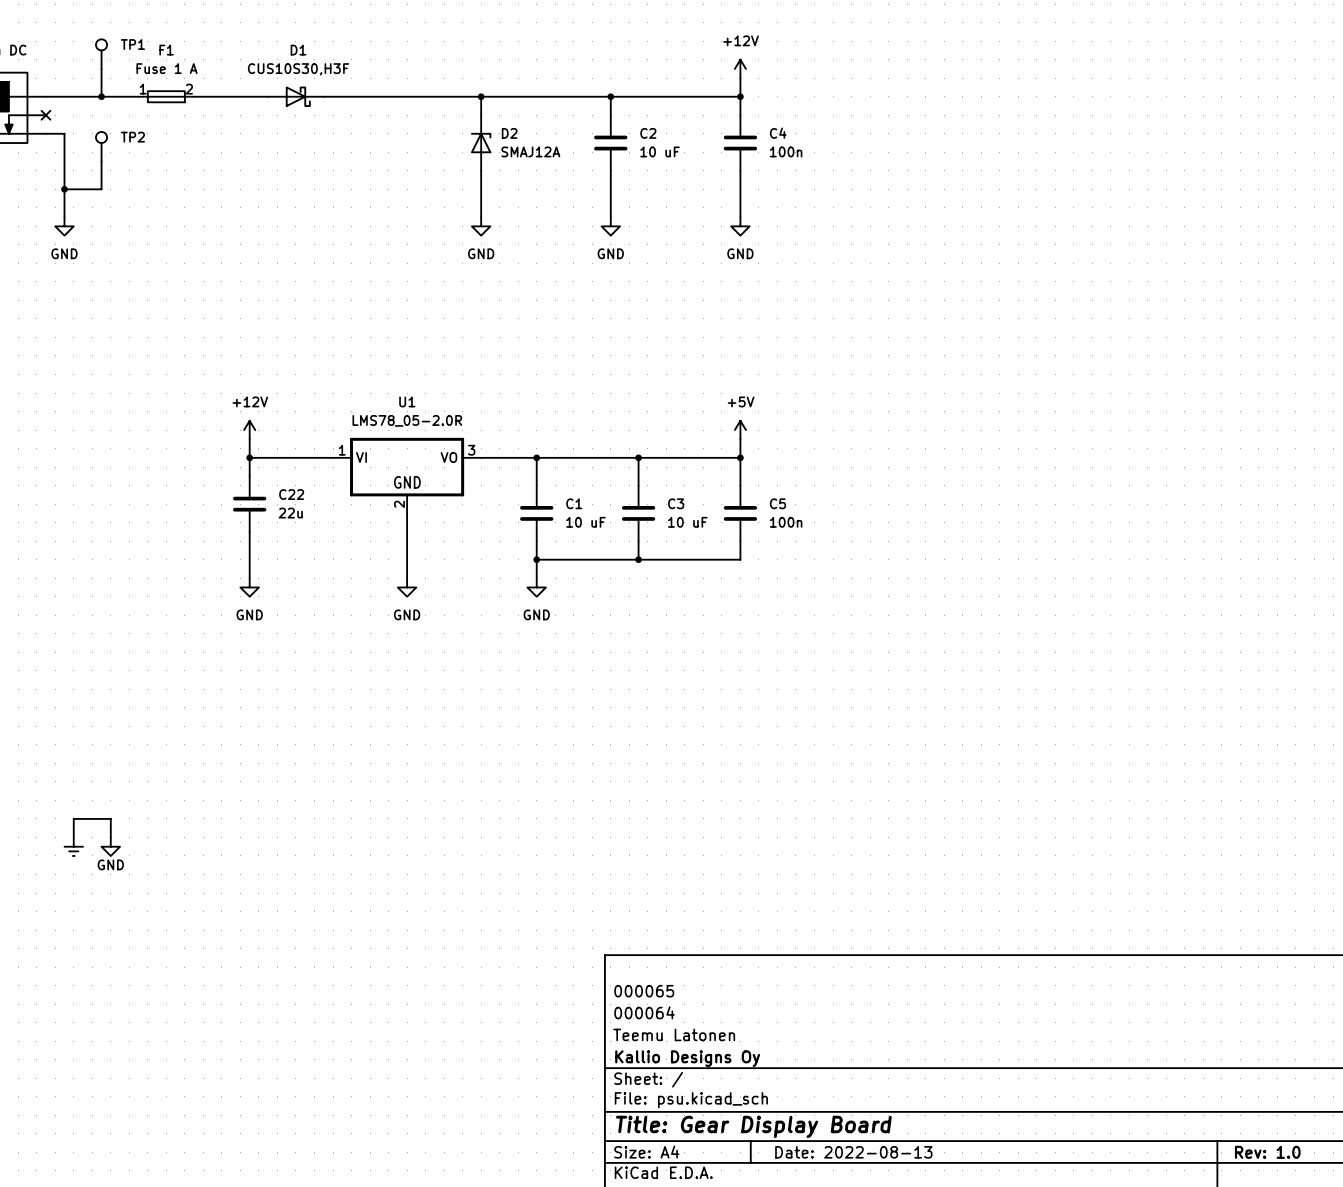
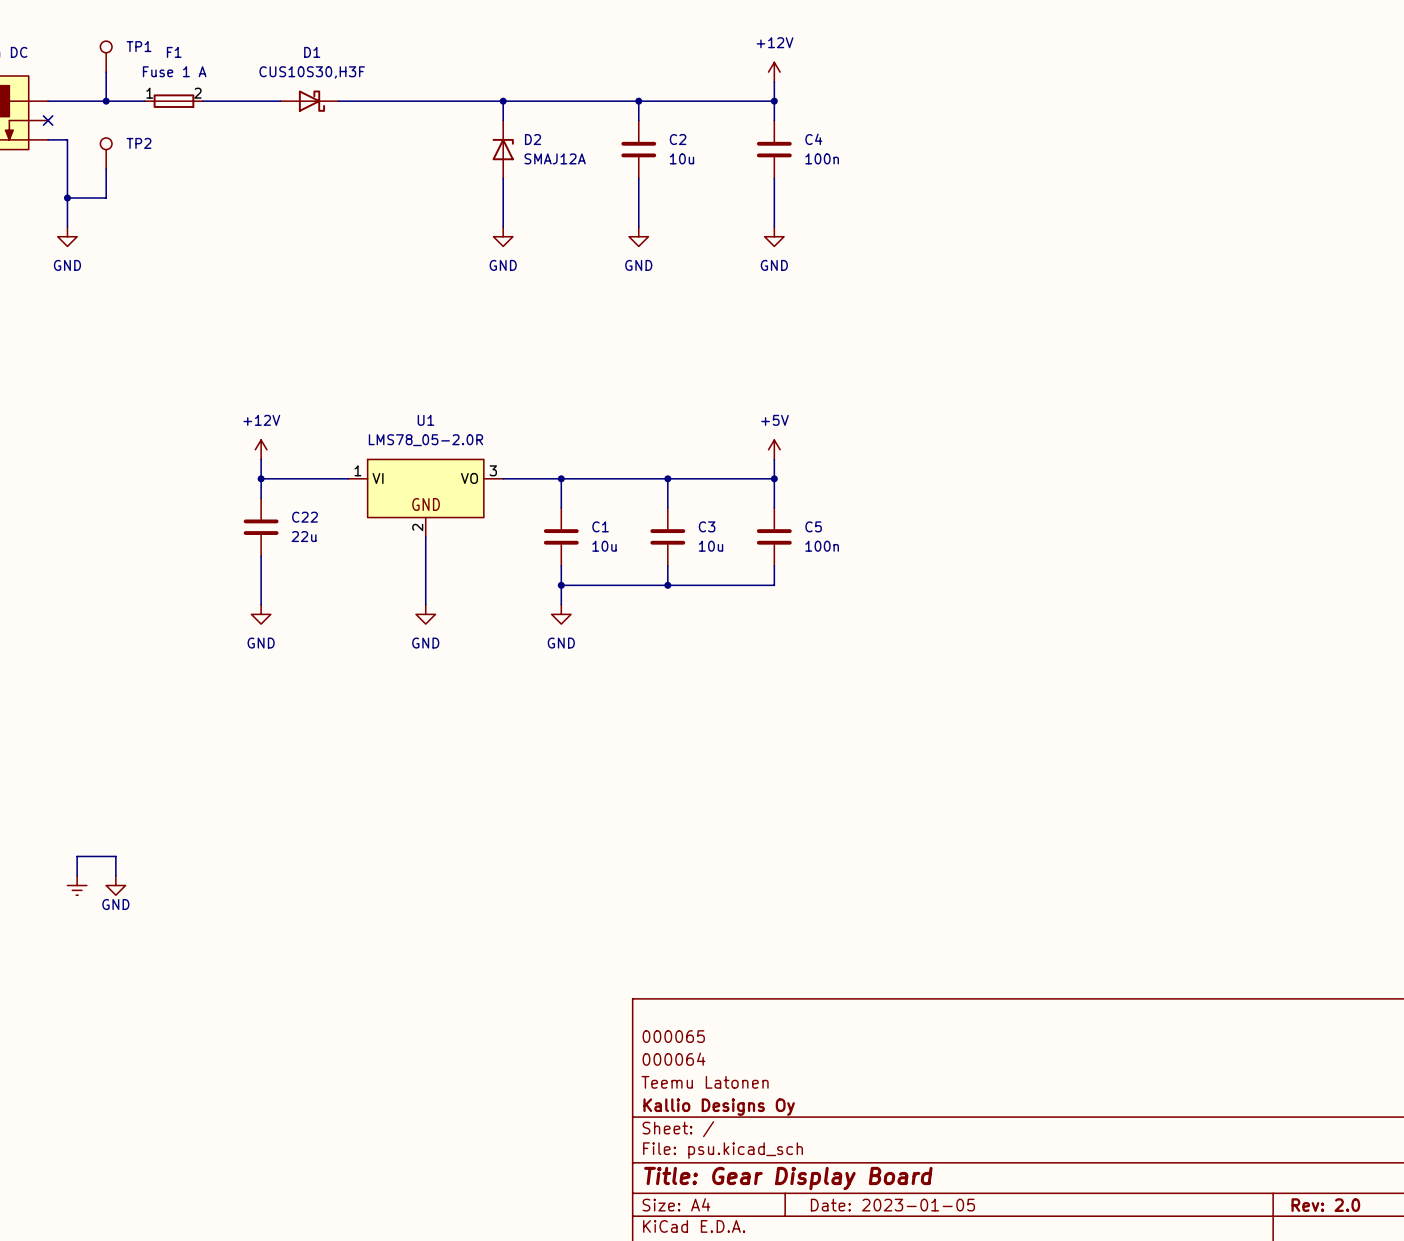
C2 text: 10 uF (660, 151) -> 10u (681, 158)
U1 symbol: [333, 437, 482, 514] -> [348, 459, 504, 537]
C1 text: 10 uF (585, 522) -> 10u (604, 546)
C3 text: 10 uF (687, 522) -> 10u (711, 546)
title block: Date: 2022-08-13 (853, 1152) -> Date: 2023-01-05 (892, 1205)
title block: Rev: 1.0 (1267, 1152) -> Rev: 2.0 (1325, 1205)

